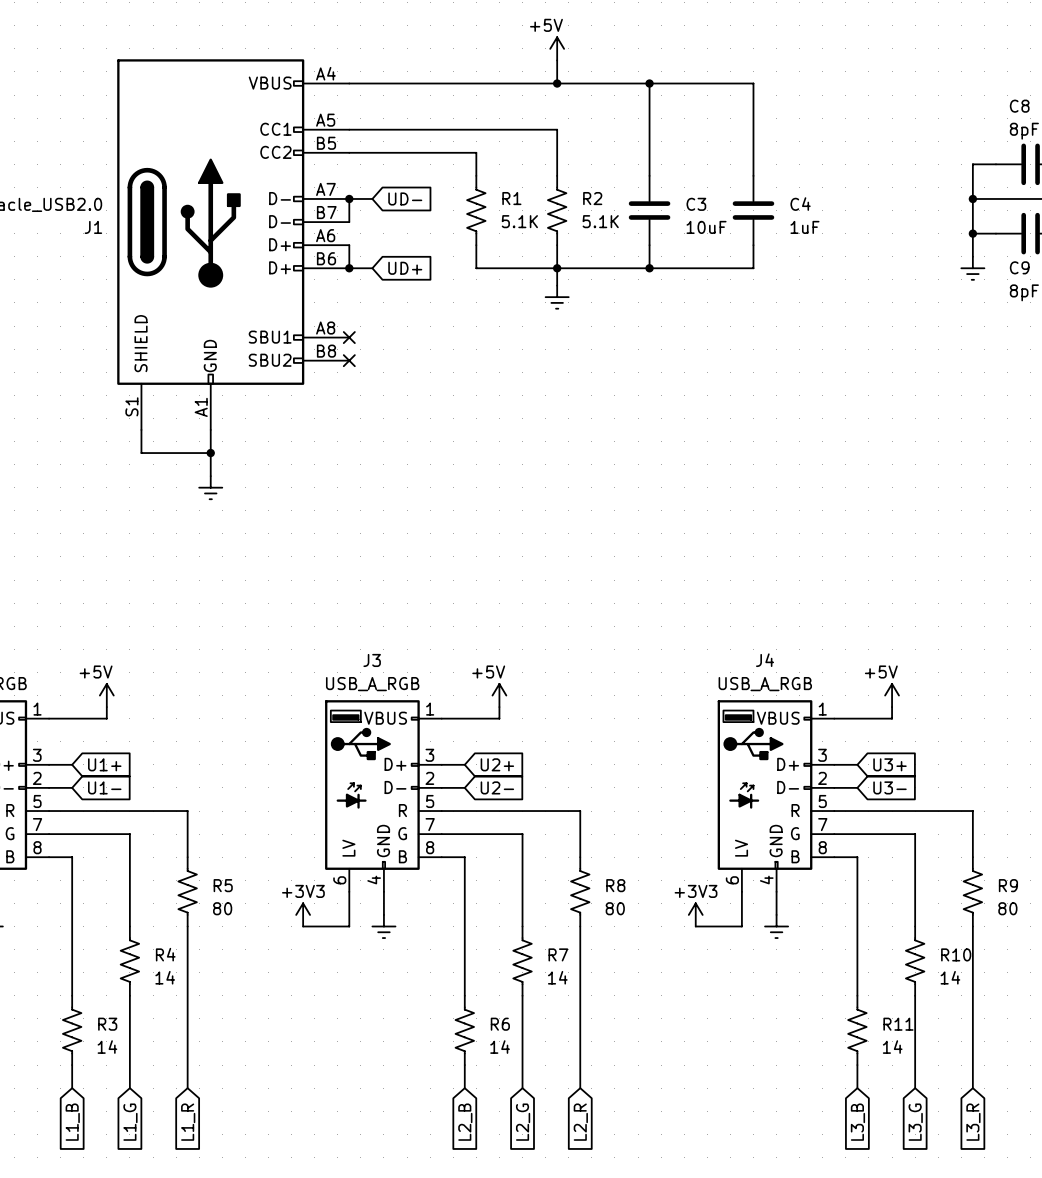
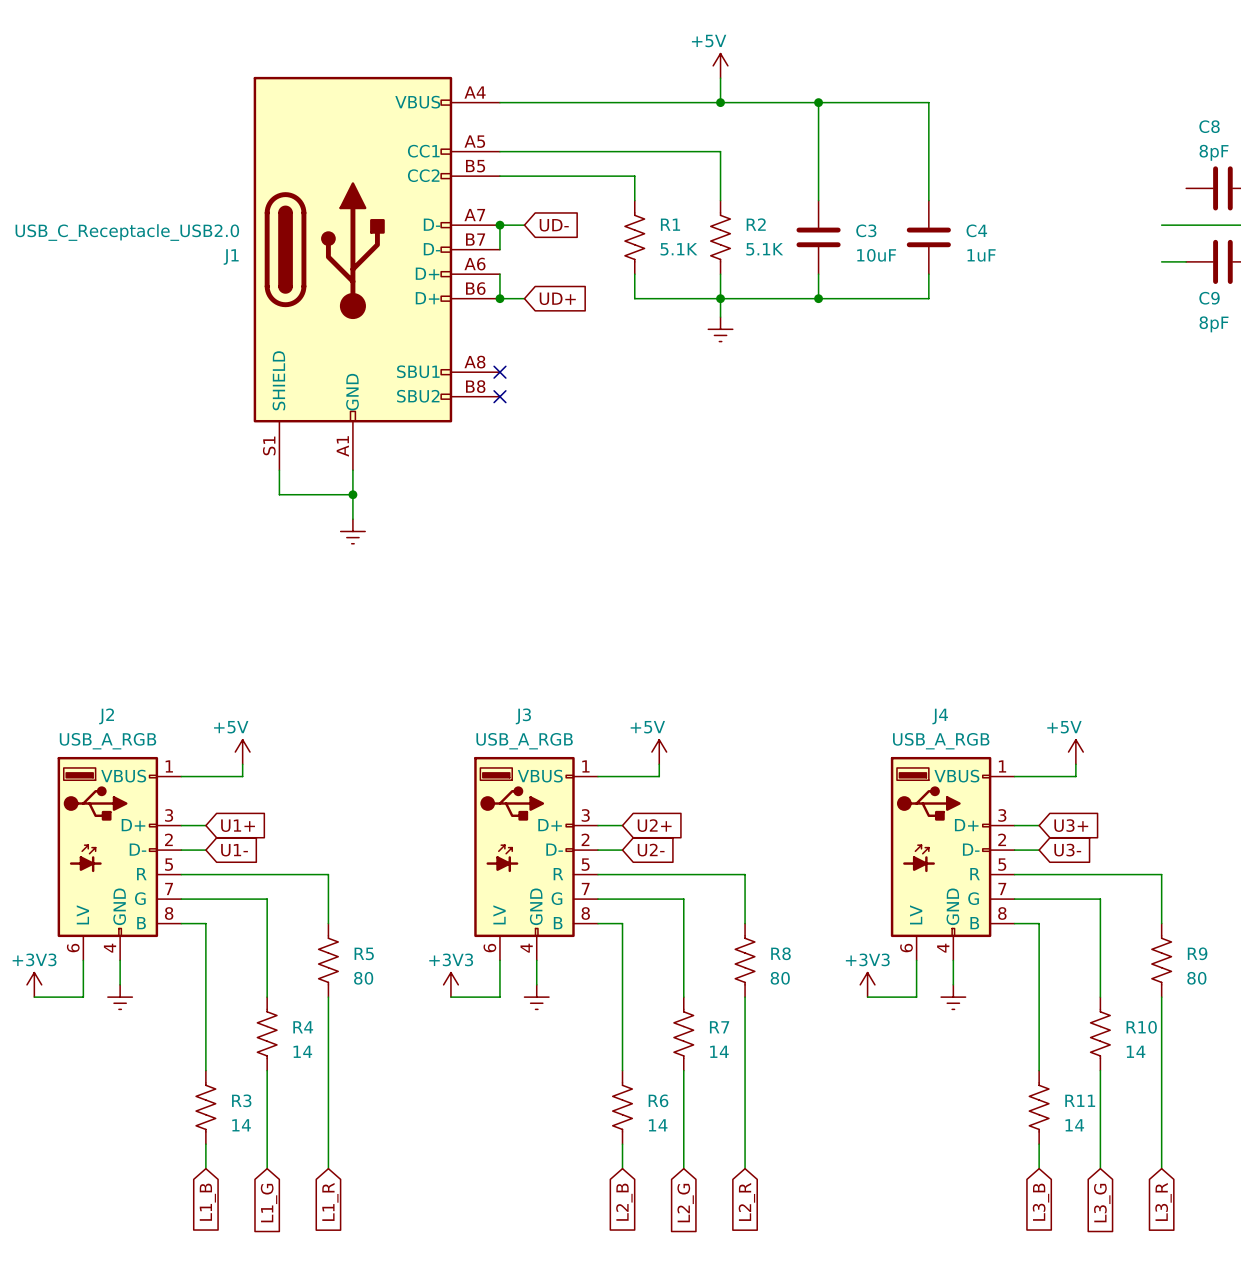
wire: (995, 164) (972, 164) (972, 256) -> none
junction: (972, 198) -> none
junction: (972, 233) -> none
power symbol: (972, 268) -> none

